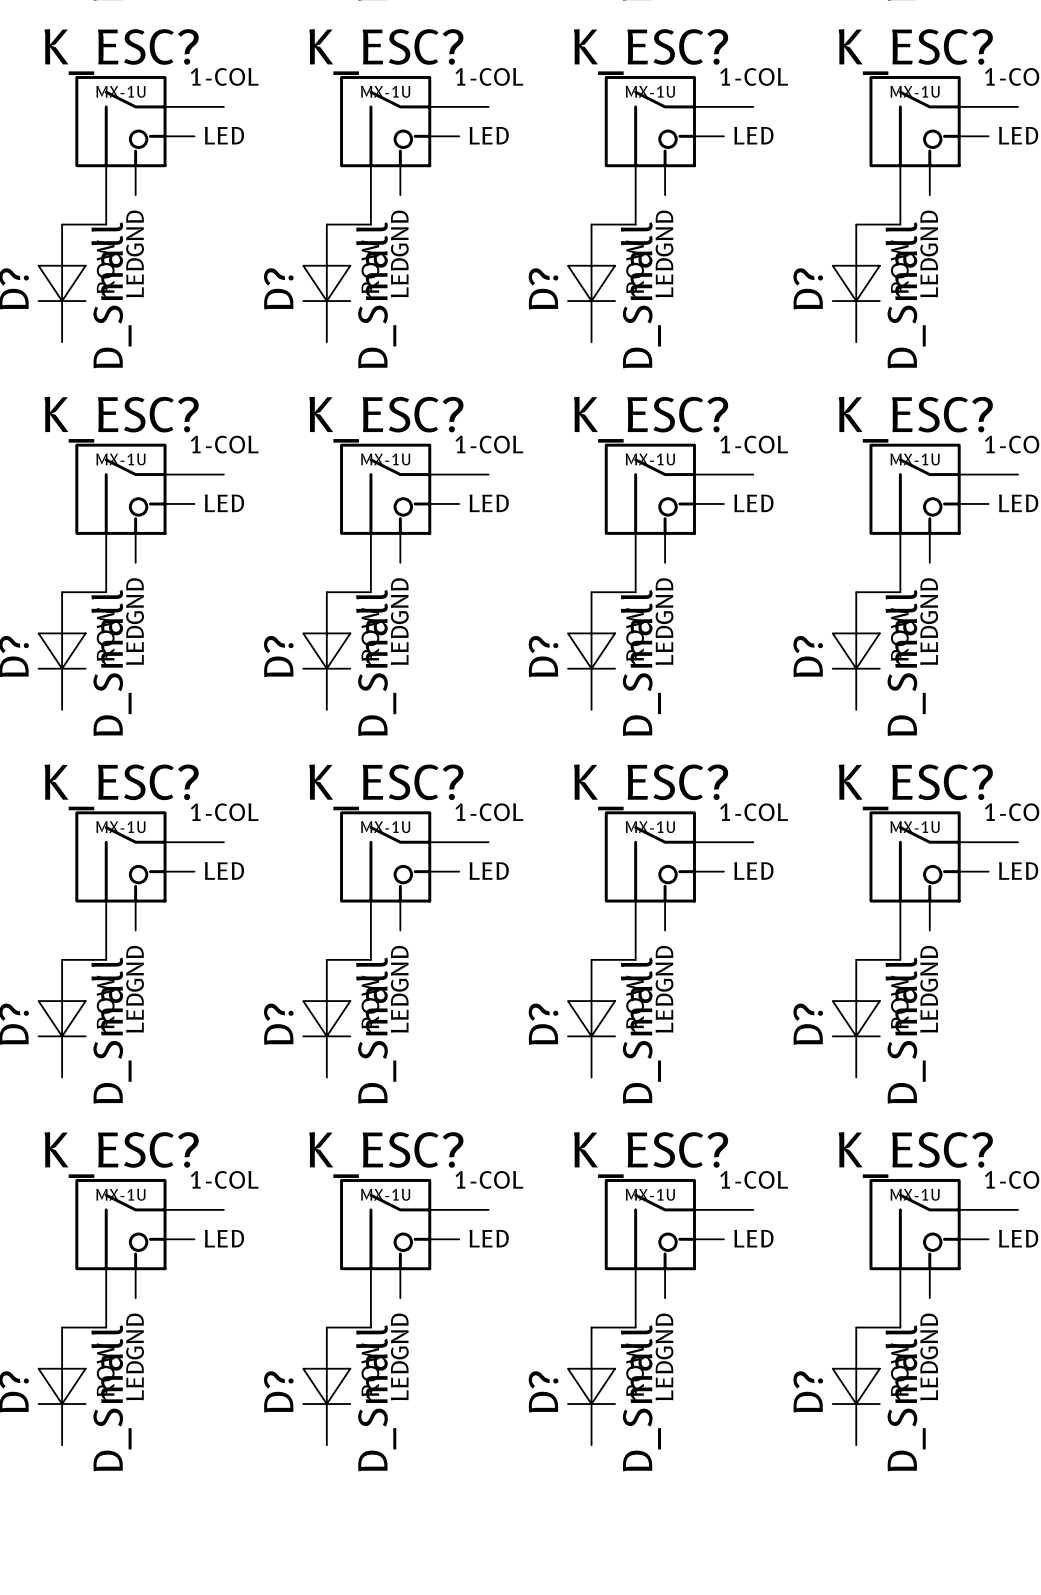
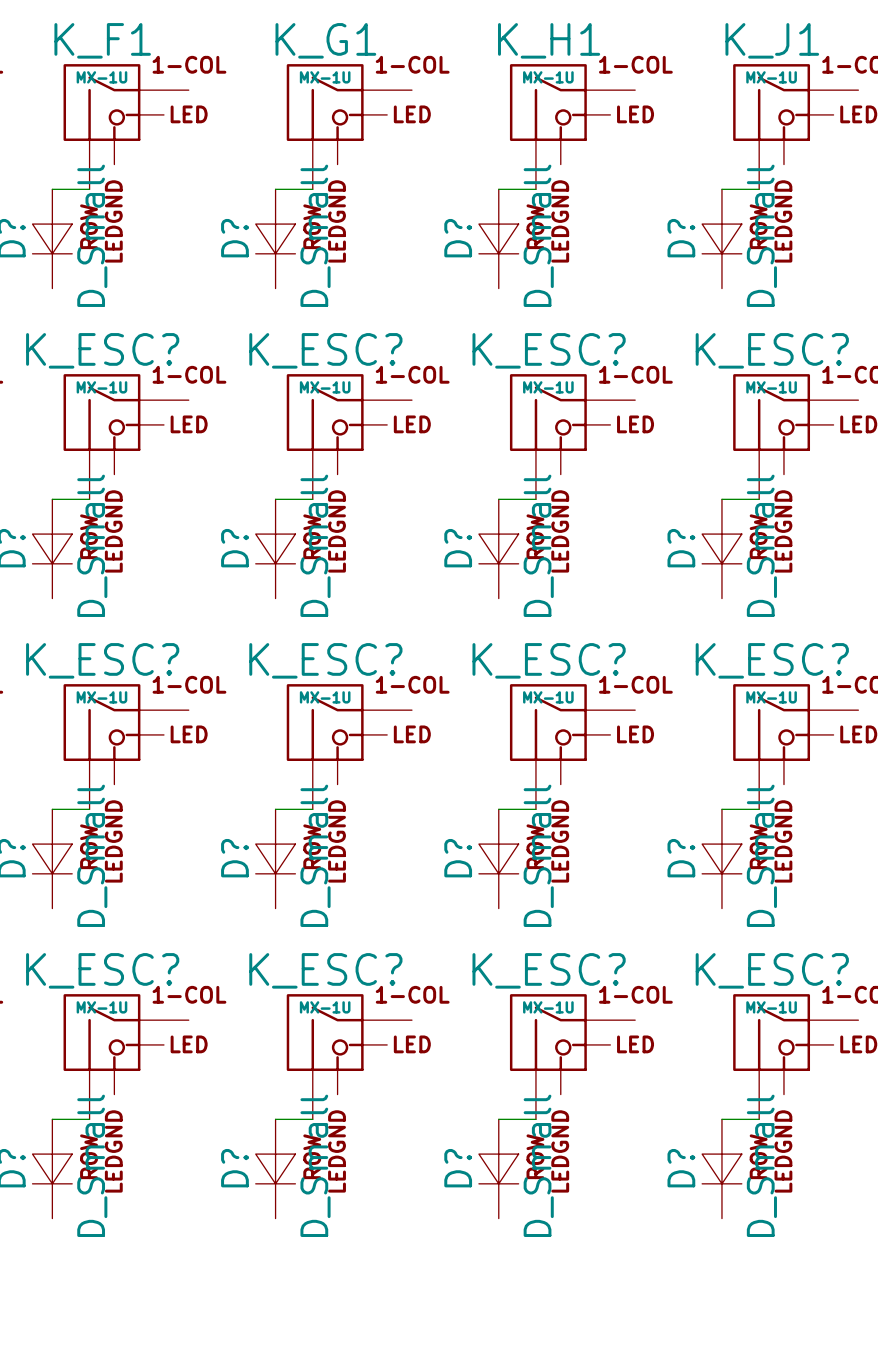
K_ESC? name: K_ESC? (121, 52) -> K_F1 (102, 40)
K_ESC? name: K_ESC? (386, 52) -> K_G1 (325, 40)
K_ESC? name: K_ESC? (651, 52) -> K_H1 (549, 40)
K_ESC? name: K_ESC? (915, 52) -> K_J1 (772, 40)

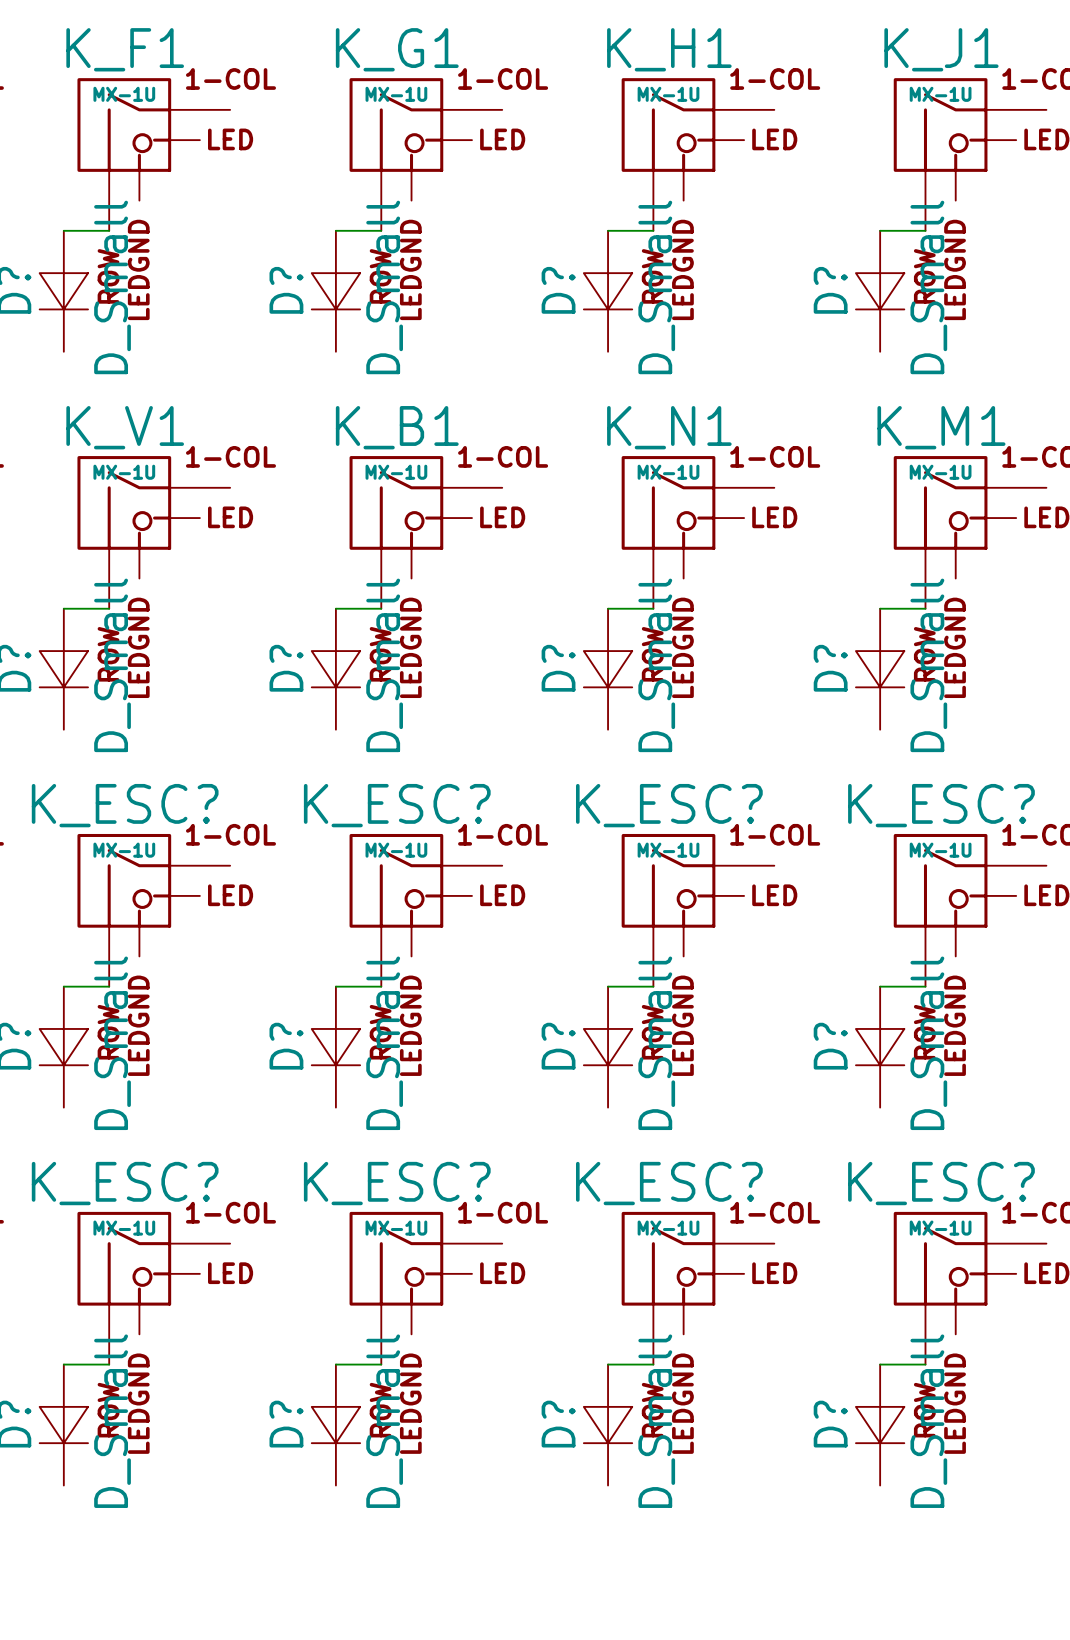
K_ESC? name: K_ESC? (102, 350) -> K_V1 (125, 427)
K_ESC? name: K_ESC? (325, 350) -> K_B1 (397, 427)
K_ESC? name: K_ESC? (549, 350) -> K_N1 (669, 427)
K_ESC? name: K_ESC? (772, 350) -> K_M1 (941, 427)

